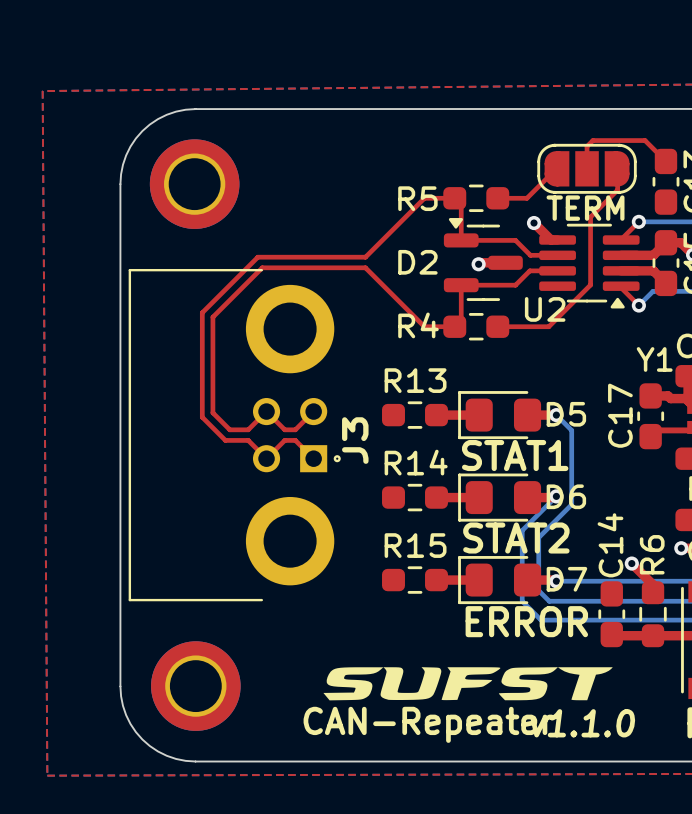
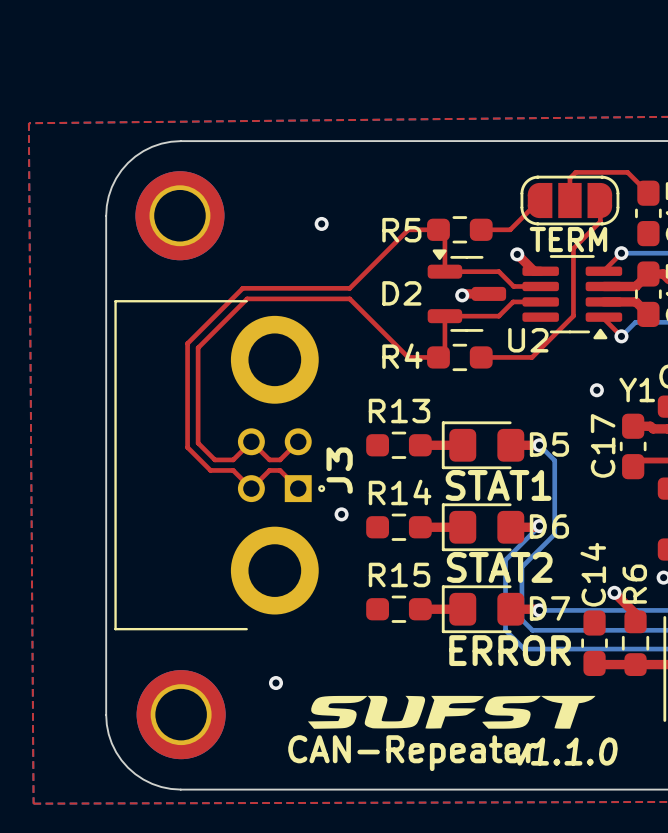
via: none -> (321, 223)
via: none -> (596, 390)
via: none -> (341, 514)
via: none -> (275, 683)

